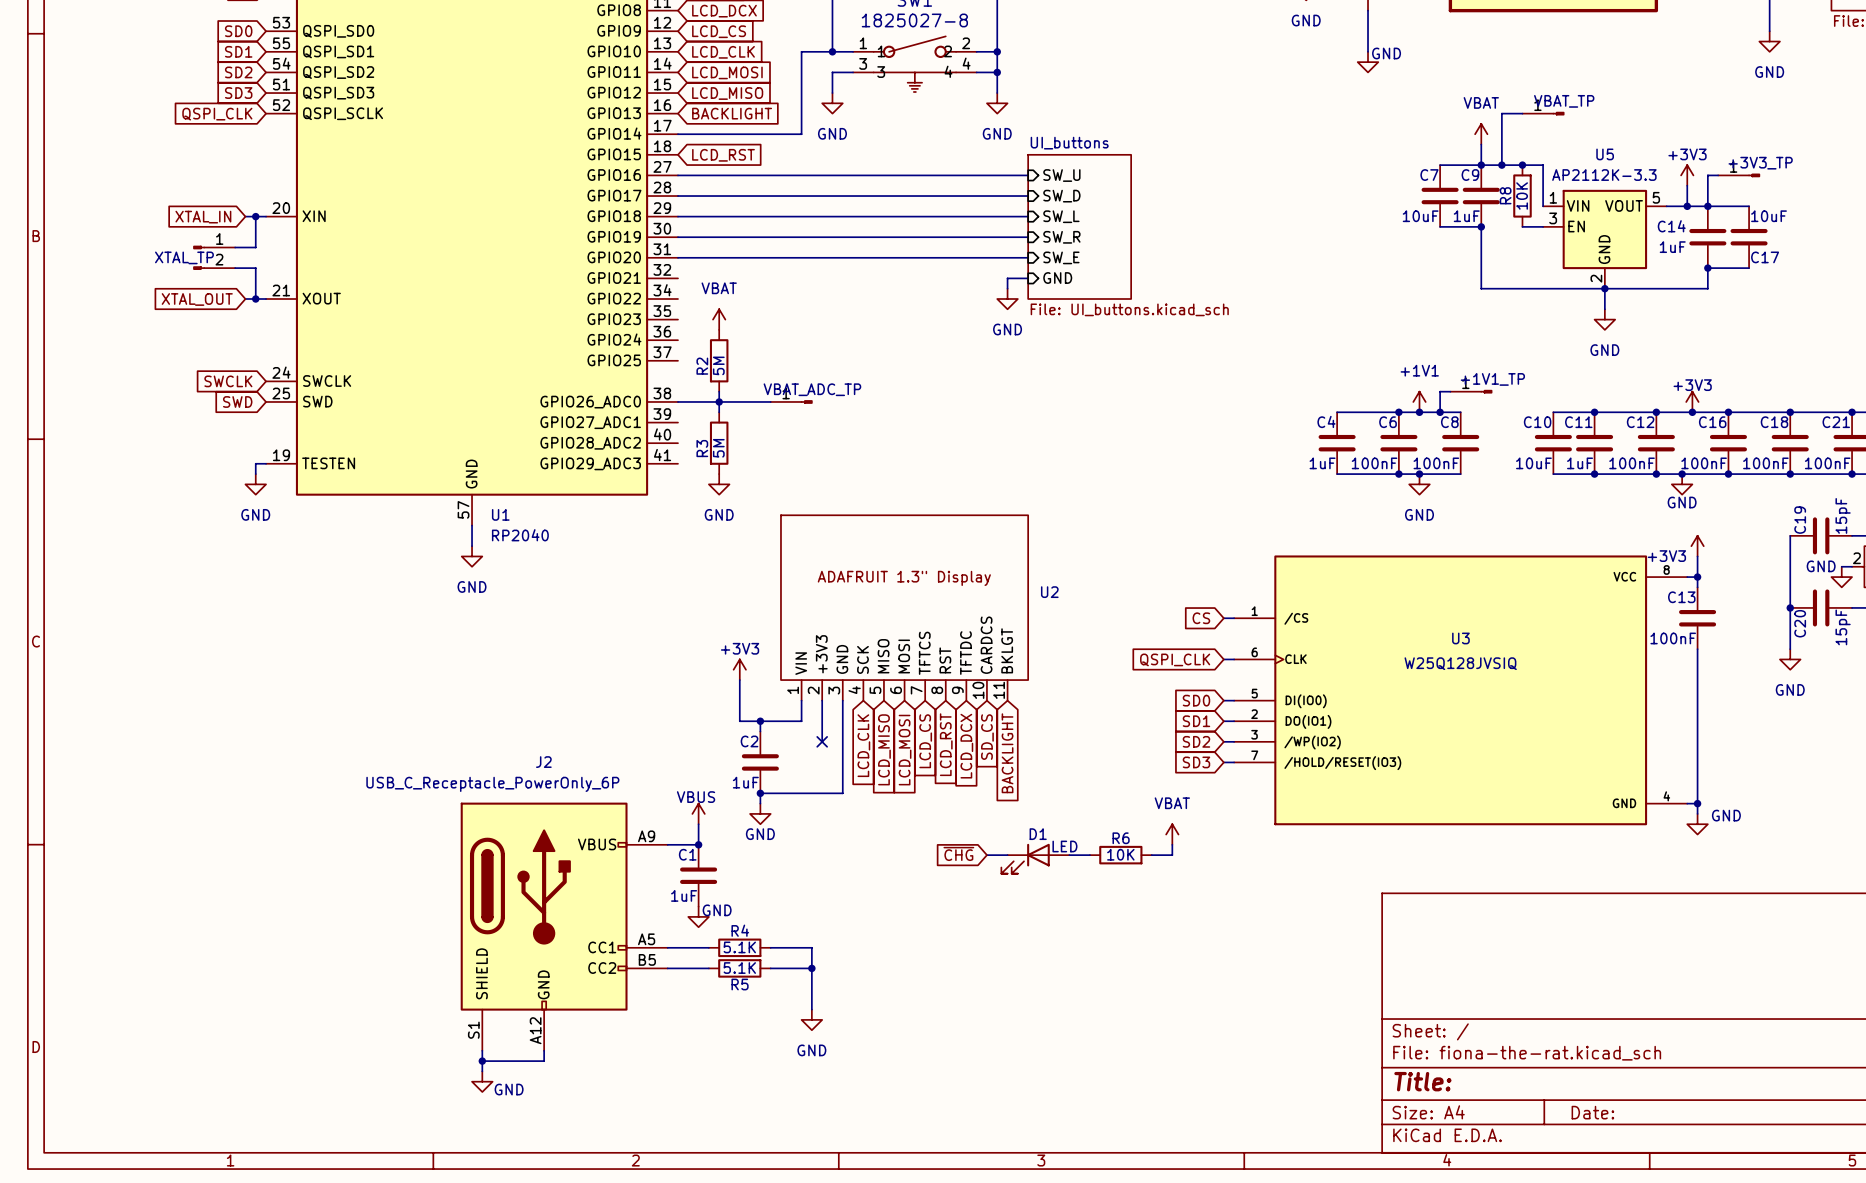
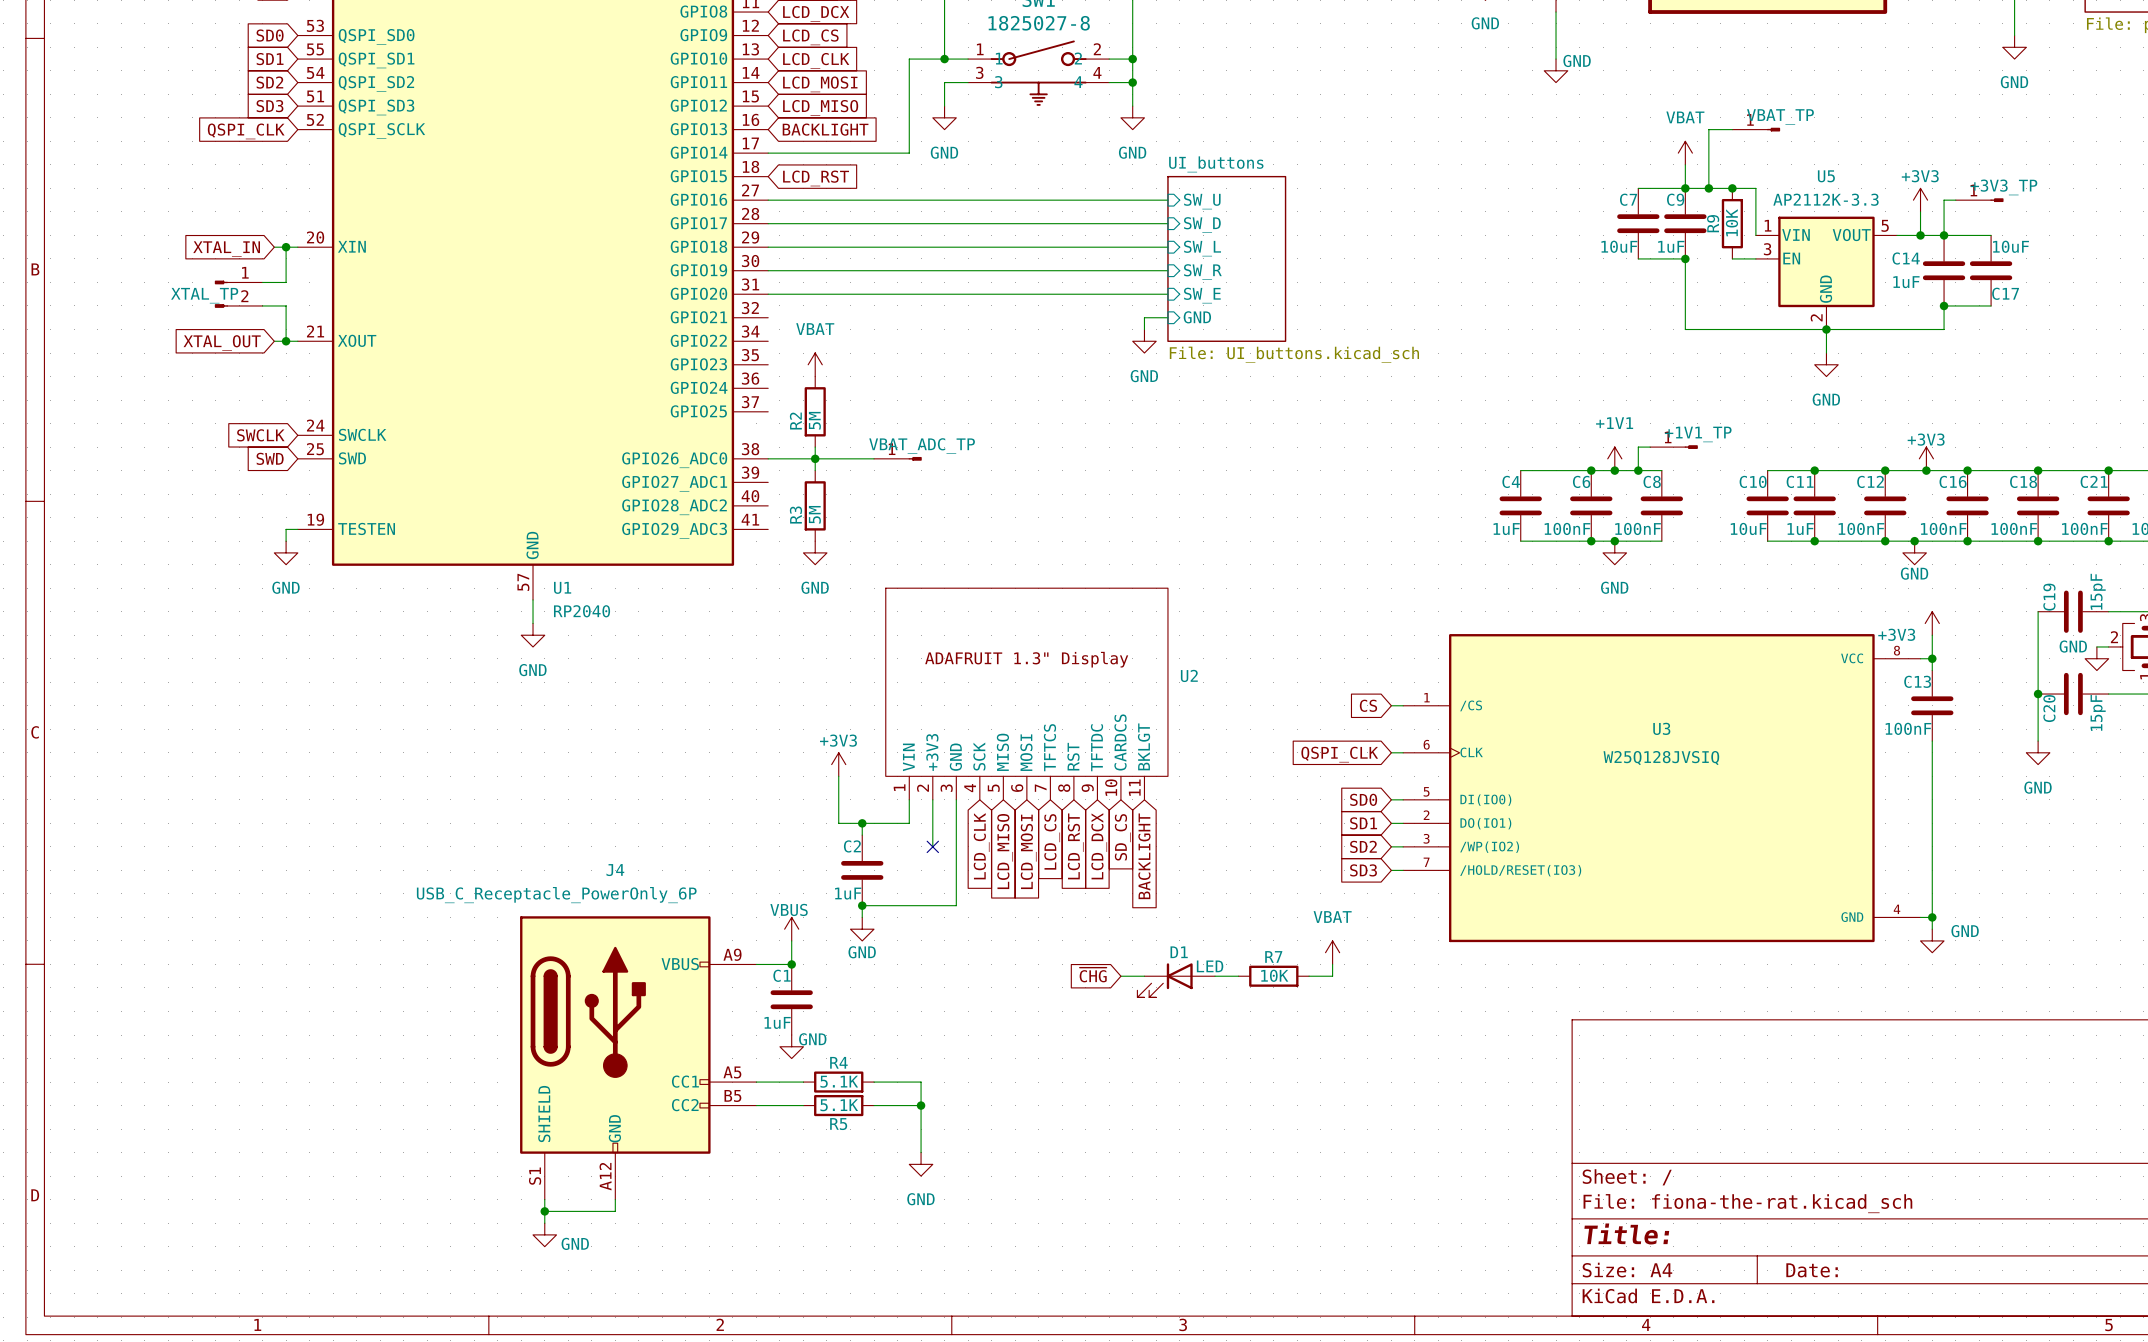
R8 name: R8 (1505, 195) -> R9 (1713, 223)
J2 name: J2 (543, 762) -> J4 (615, 870)
R6 name: R6 (1121, 838) -> R7 (1273, 956)

